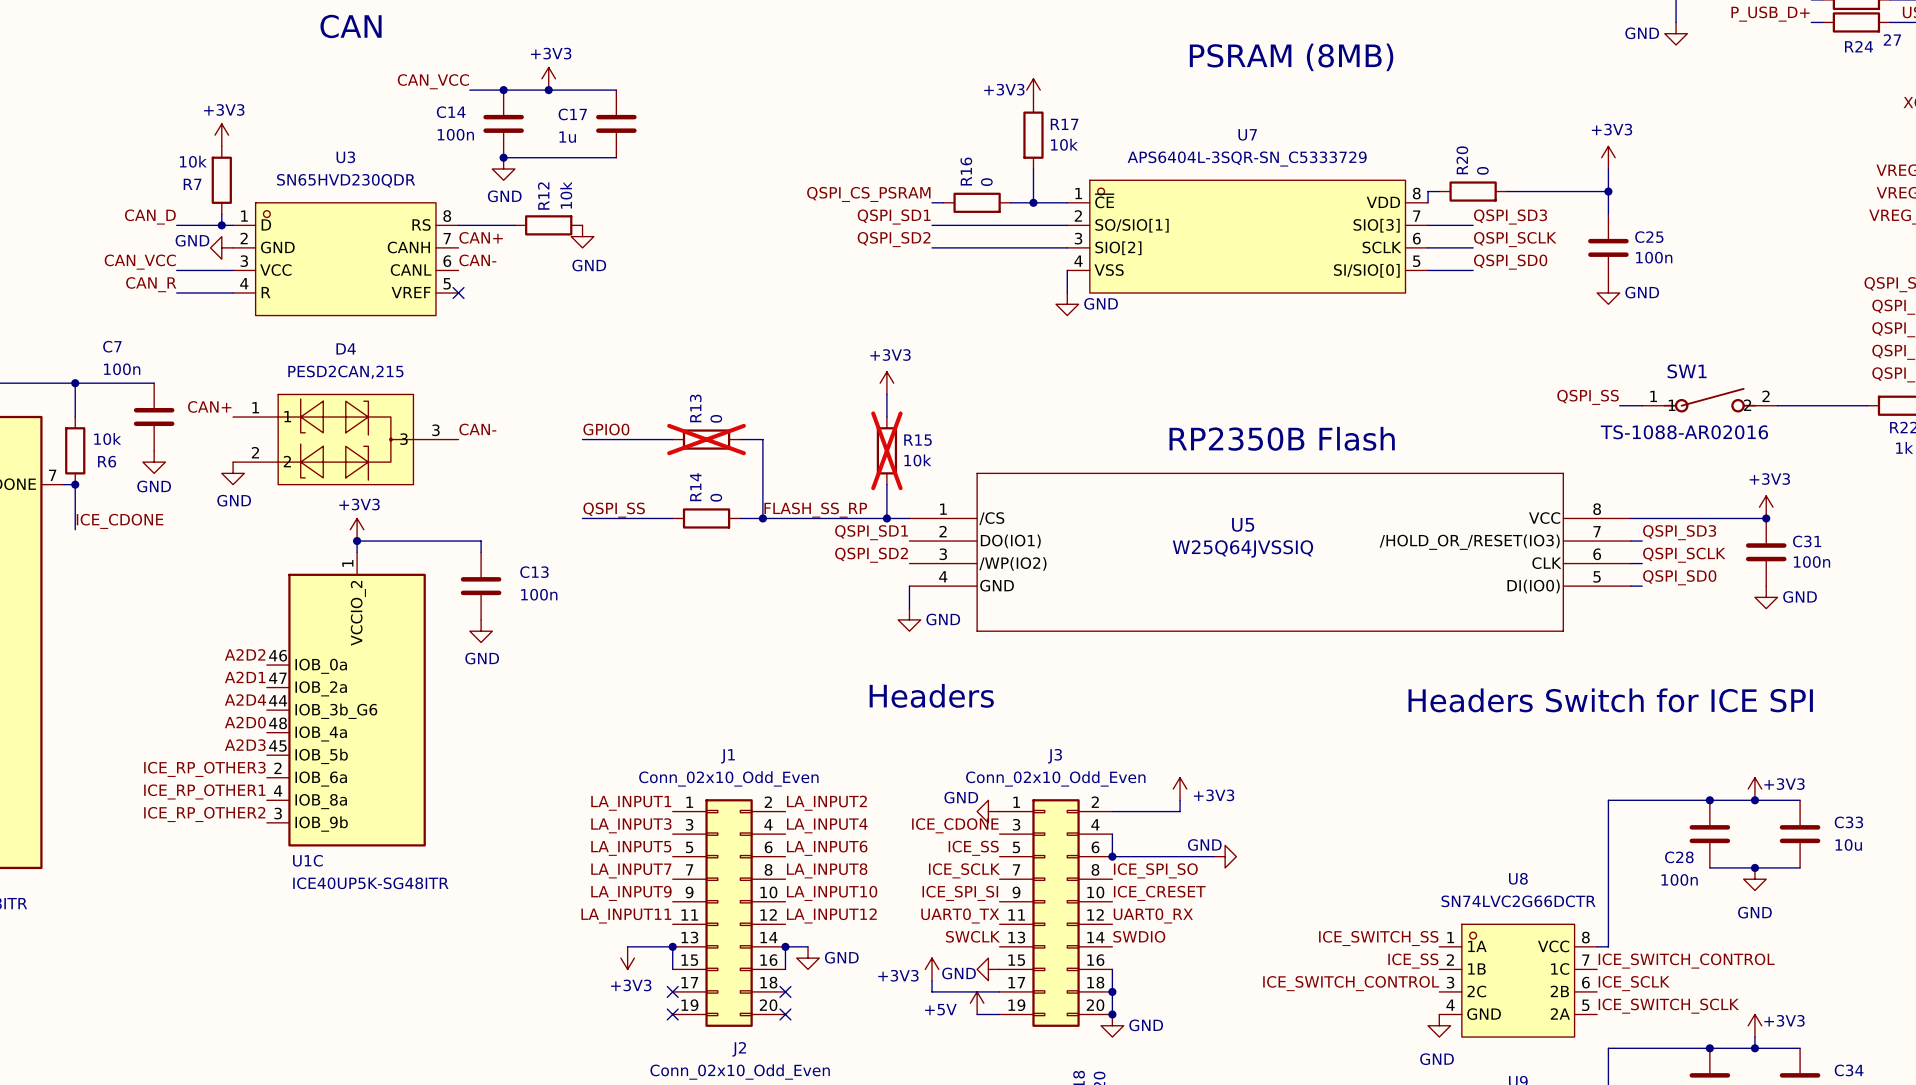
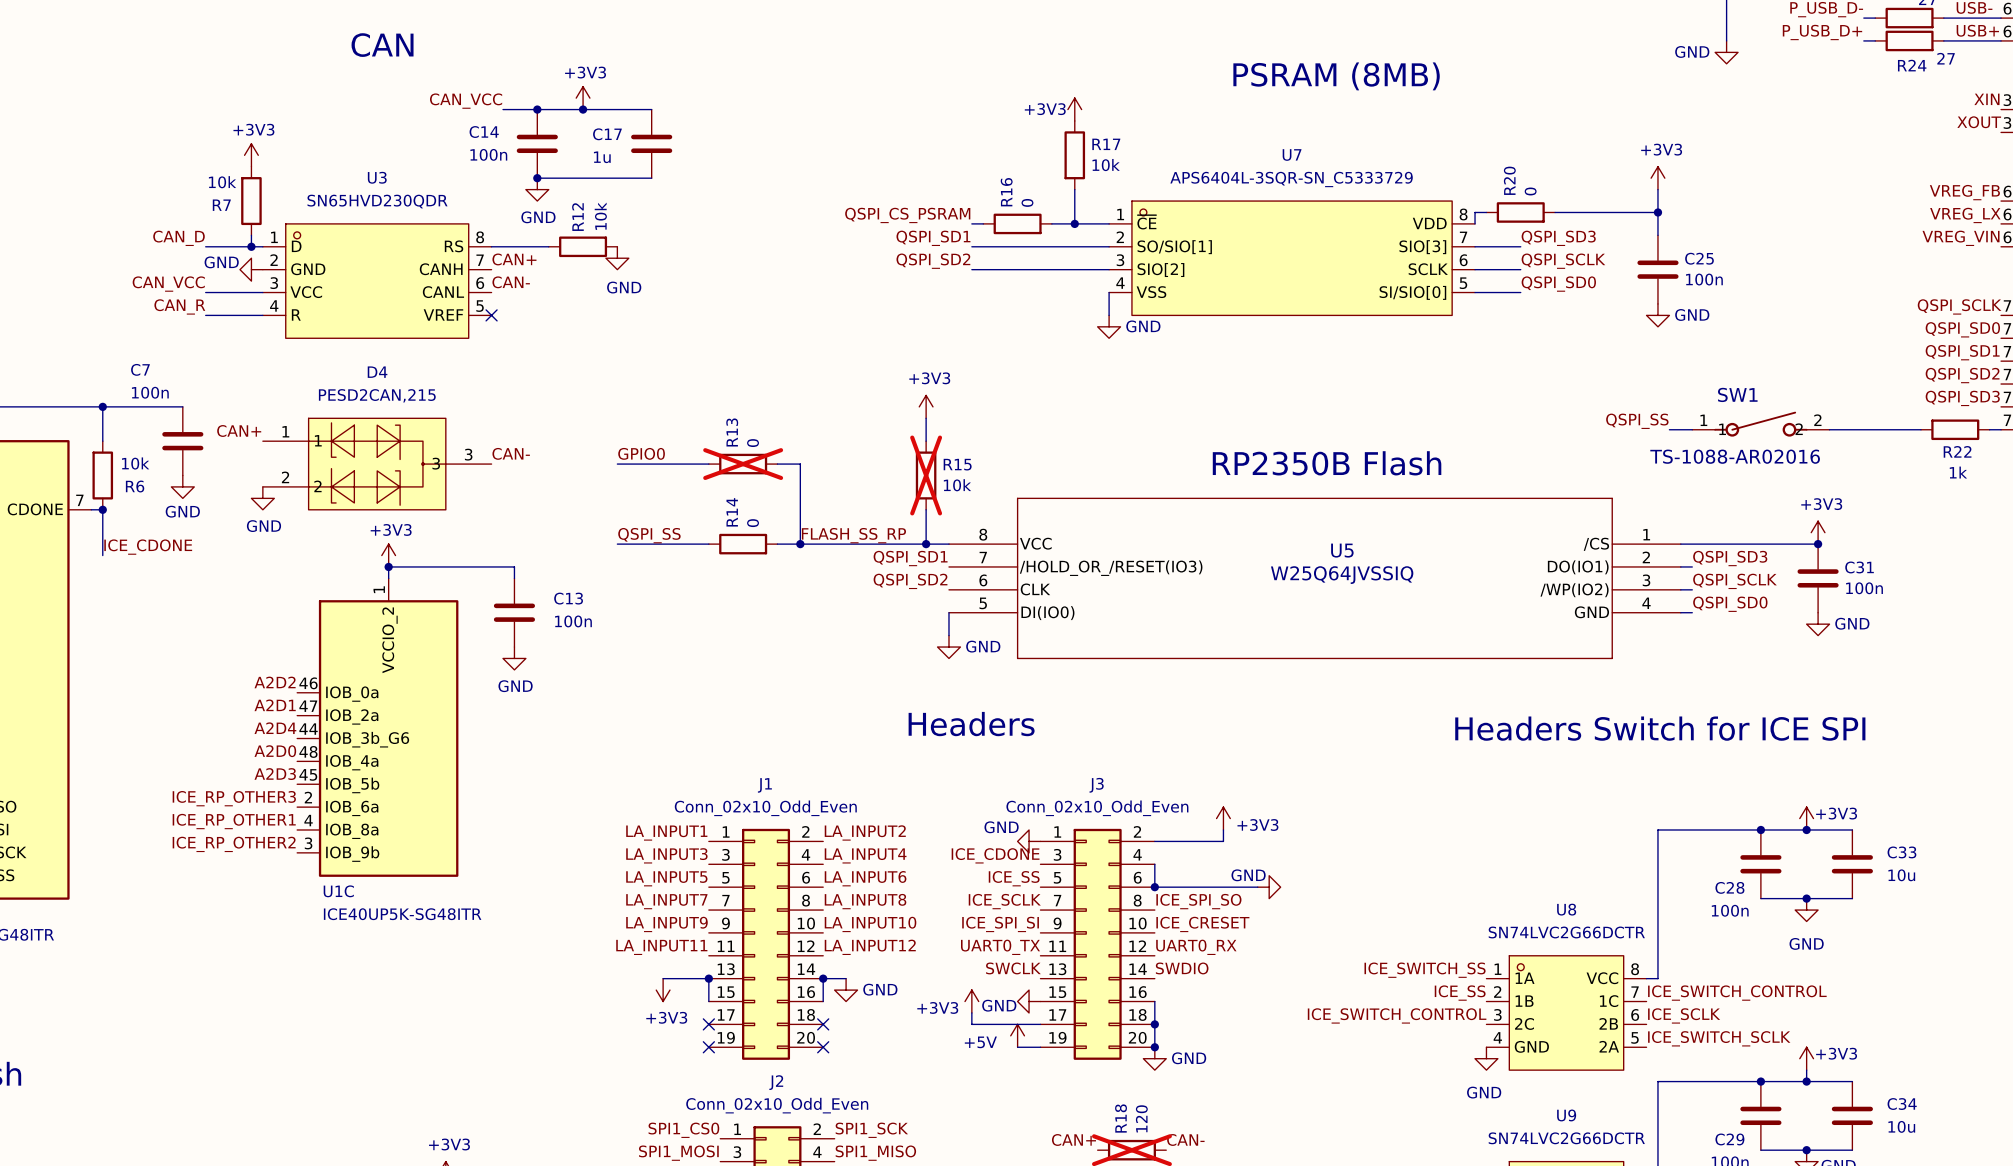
U5 flip: as is (1270, 552) -> left-right (1314, 578)

